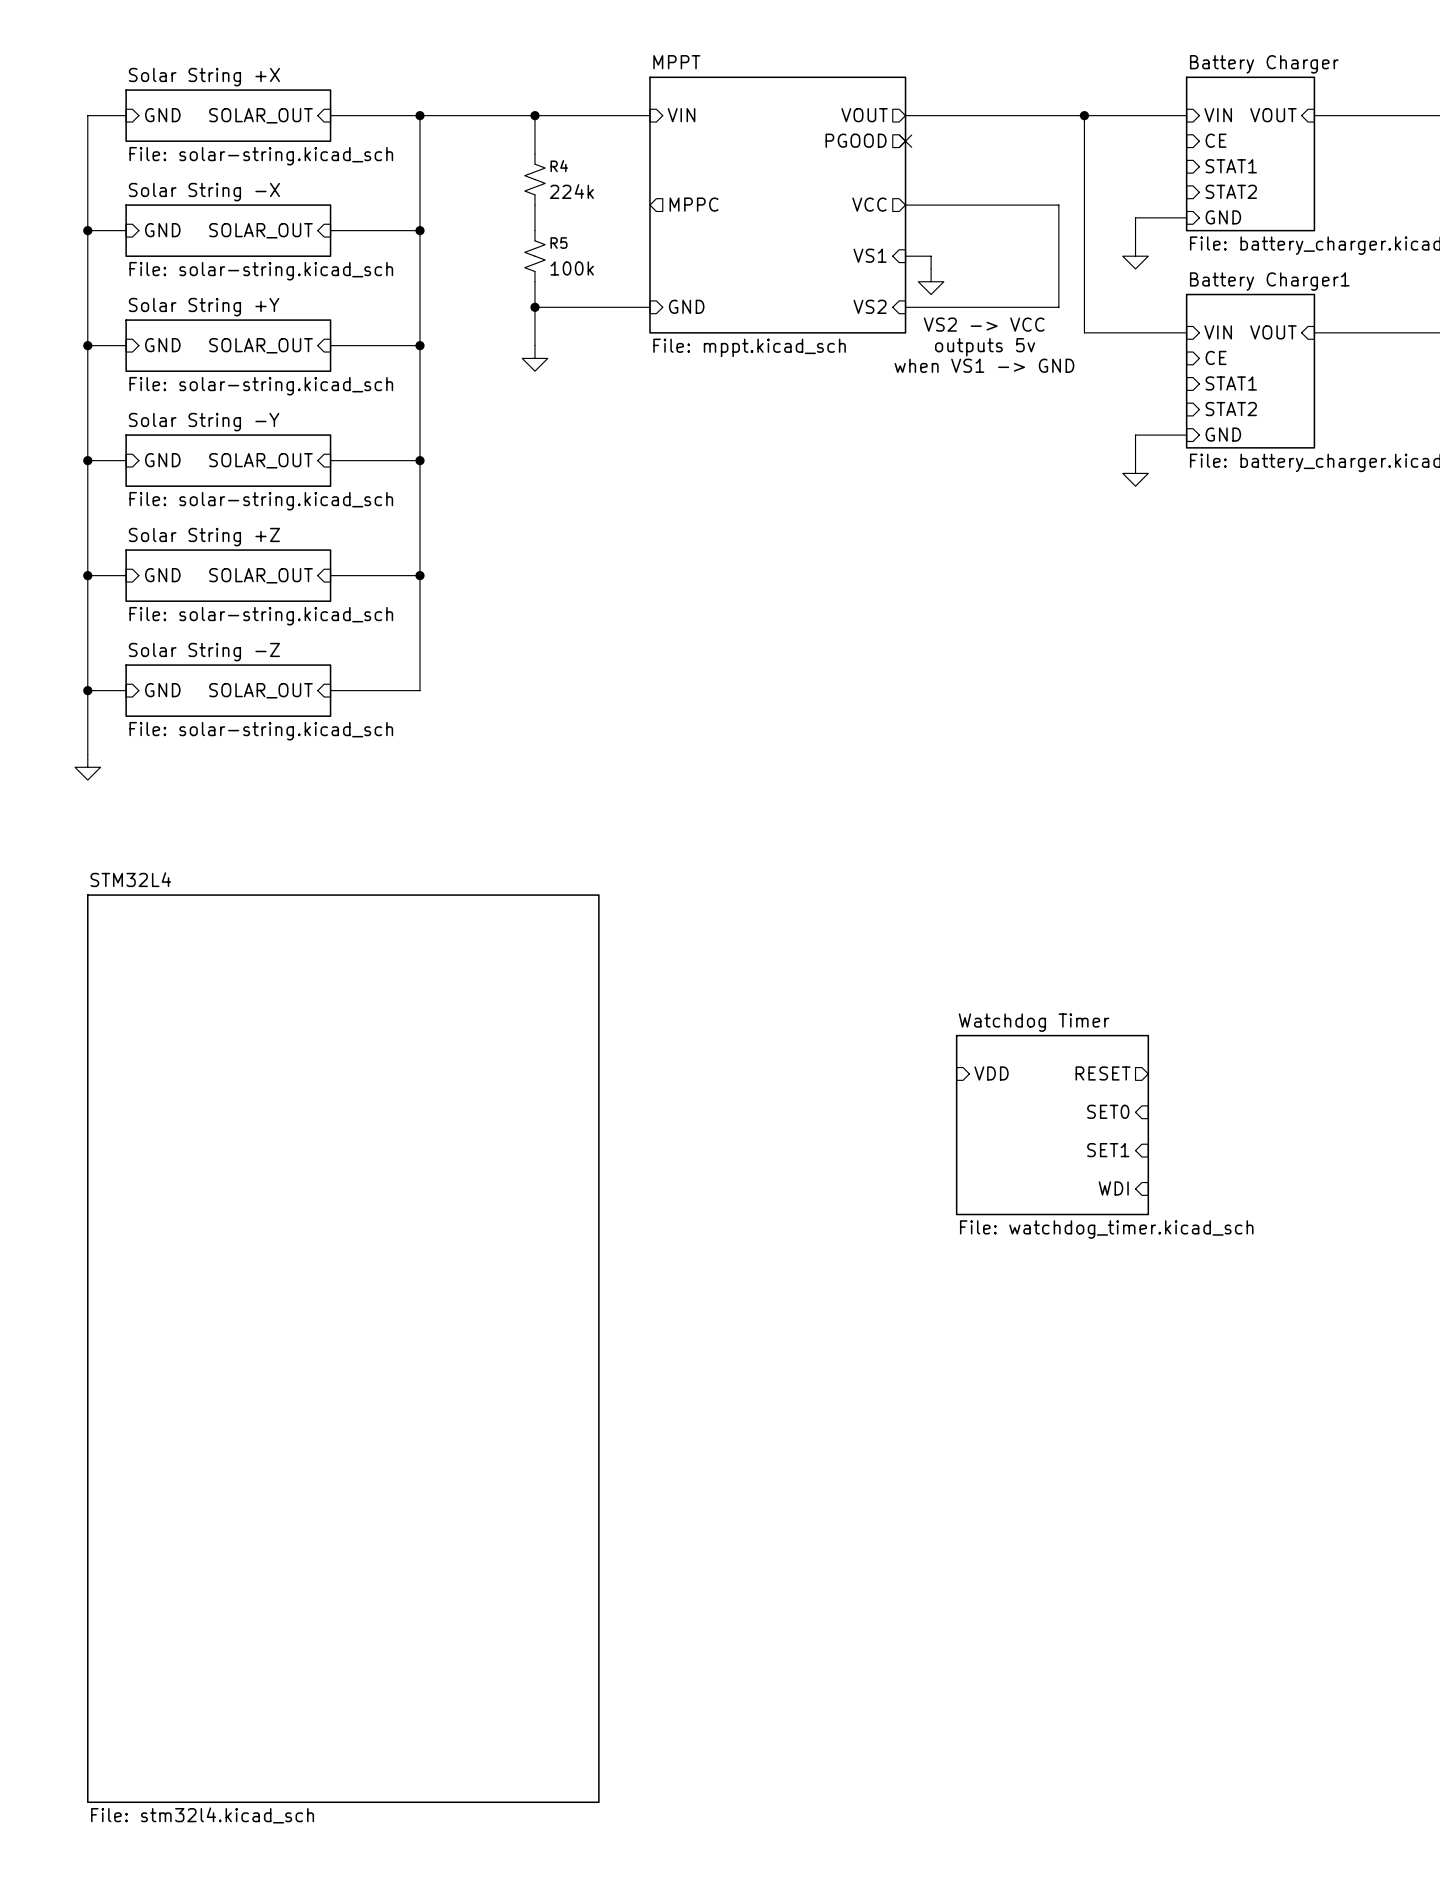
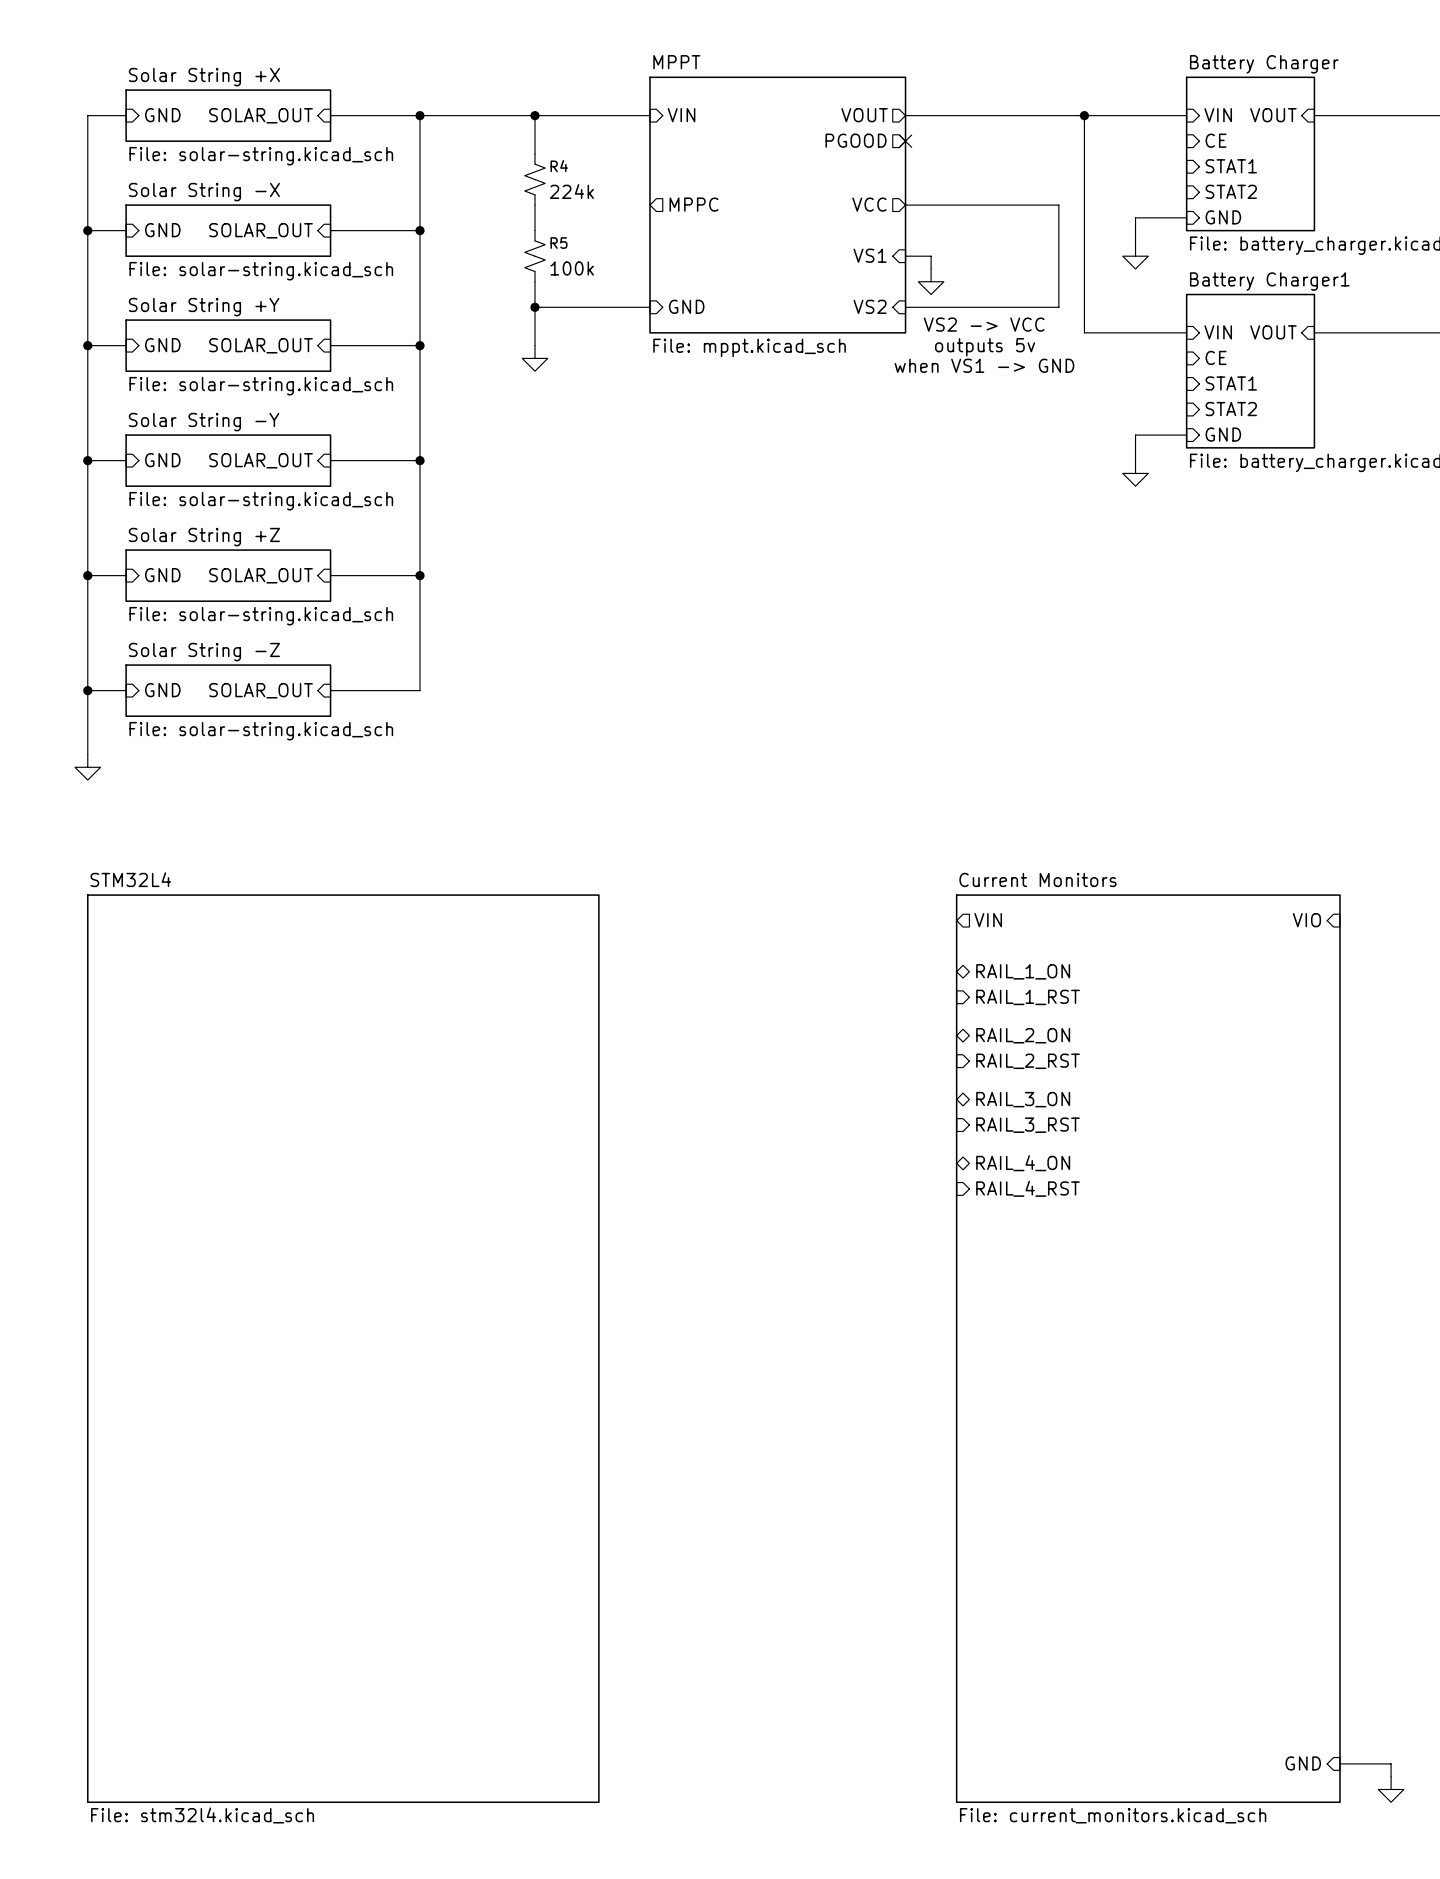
sheet pin: none -> VIN (988, 920)
sheet pin: none -> VIO (1306, 920)
sheet pin: none -> RAIL_1_ON (1023, 971)
sheet pin: none -> RAIL_1_RST (1028, 997)
sheet pin: none -> RAIL_2_ON (1023, 1035)
sheet pin: none -> RAIL_2_RST (1028, 1061)
sheet pin: VDD (991, 1073) -> none
sheet pin: RESET (1103, 1073) -> none
sheet pin: none -> RAIL_3_ON (1023, 1099)
sheet pin: SET0 (1108, 1111) -> none
sheet pin: none -> RAIL_3_RST (1028, 1125)
sheet Watchdog Timer: File: watchdog_timer.kicad_sch (1052, 1125) -> none
sheet pin: SET1 (1108, 1150) -> none
sheet pin: none -> RAIL_4_ON (1023, 1163)
sheet pin: none -> RAIL_4_RST (1028, 1188)
sheet pin: WDI (1113, 1188) -> none
sheet Current Monitors: none -> File: current_monitors.kicad_sch (1148, 1348)
sheet pin: none -> GND (1303, 1763)
wire: none -> (1339, 1763) (1391, 1763) (1391, 1776)
power symbol: none -> (1391, 1789)

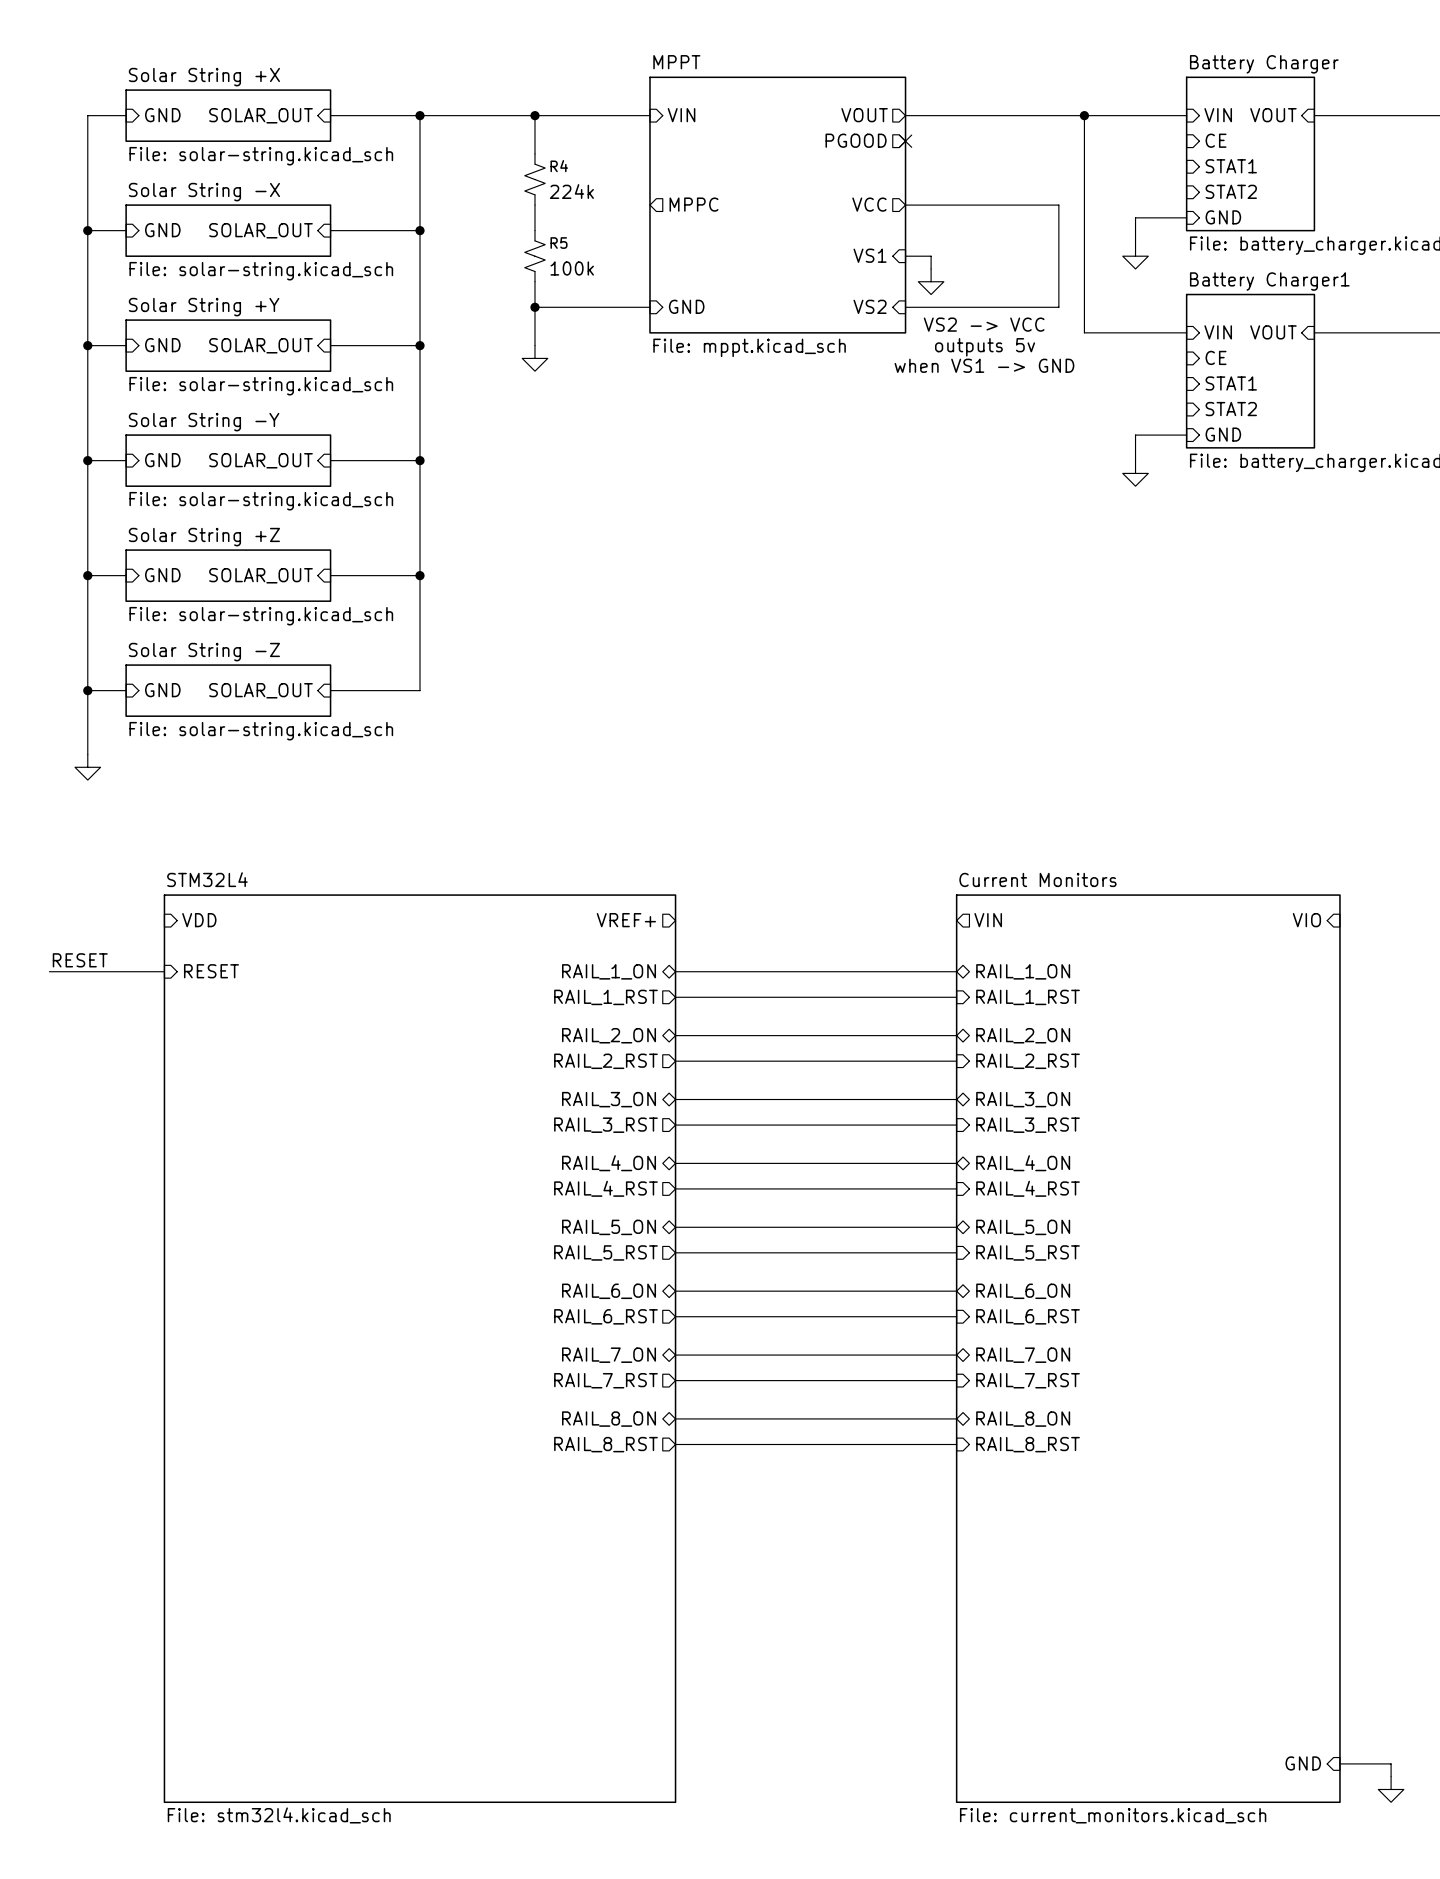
sheet pin: none -> VDD (199, 920)
sheet pin: none -> VREF+ (626, 920)
label: none -> RESET (80, 960)
wire: none -> (49, 971) (164, 971)
sheet pin: none -> RESET (211, 971)
sheet pin: none -> RAIL_1_ON (609, 971)
wire: none -> (675, 971) (956, 971)
sheet pin: none -> RAIL_1_RST (605, 997)
wire: none -> (675, 997) (956, 997)
sheet pin: none -> RAIL_2_ON (609, 1035)
wire: none -> (675, 1035) (956, 1035)
sheet pin: none -> RAIL_2_RST (605, 1061)
wire: none -> (675, 1061) (956, 1061)
sheet pin: none -> RAIL_3_ON (609, 1099)
wire: none -> (675, 1099) (956, 1099)
sheet pin: none -> RAIL_3_RST (605, 1125)
wire: none -> (675, 1125) (956, 1125)
sheet pin: none -> RAIL_4_ON (609, 1163)
wire: none -> (675, 1163) (956, 1163)
sheet pin: none -> RAIL_4_RST (605, 1188)
wire: none -> (675, 1188) (956, 1188)
sheet pin: none -> RAIL_5_ON (609, 1227)
wire: none -> (675, 1227) (956, 1227)
sheet pin: none -> RAIL_5_ON (1023, 1227)
sheet pin: none -> RAIL_5_RST (605, 1252)
wire: none -> (675, 1252) (956, 1252)
sheet pin: none -> RAIL_5_RST (1028, 1252)
sheet pin: none -> RAIL_6_ON (609, 1291)
wire: none -> (675, 1291) (956, 1291)
sheet pin: none -> RAIL_6_ON (1023, 1291)
sheet pin: none -> RAIL_6_RST (605, 1316)
wire: none -> (675, 1316) (956, 1316)
sheet pin: none -> RAIL_6_RST (1028, 1316)
sheet STM32L4 position: (343, 1348) -> (419, 1348)
sheet pin: none -> RAIL_7_ON (609, 1355)
wire: none -> (675, 1355) (956, 1355)
sheet pin: none -> RAIL_7_ON (1023, 1355)
sheet pin: none -> RAIL_7_RST (605, 1380)
wire: none -> (675, 1380) (956, 1380)
sheet pin: none -> RAIL_7_RST (1028, 1380)
wire: none -> (675, 1418) (956, 1418)
sheet pin: none -> RAIL_8_ON (609, 1419)
sheet pin: none -> RAIL_8_ON (1023, 1419)
sheet pin: none -> RAIL_8_RST (605, 1444)
wire: none -> (675, 1444) (956, 1444)
sheet pin: none -> RAIL_8_RST (1028, 1444)

